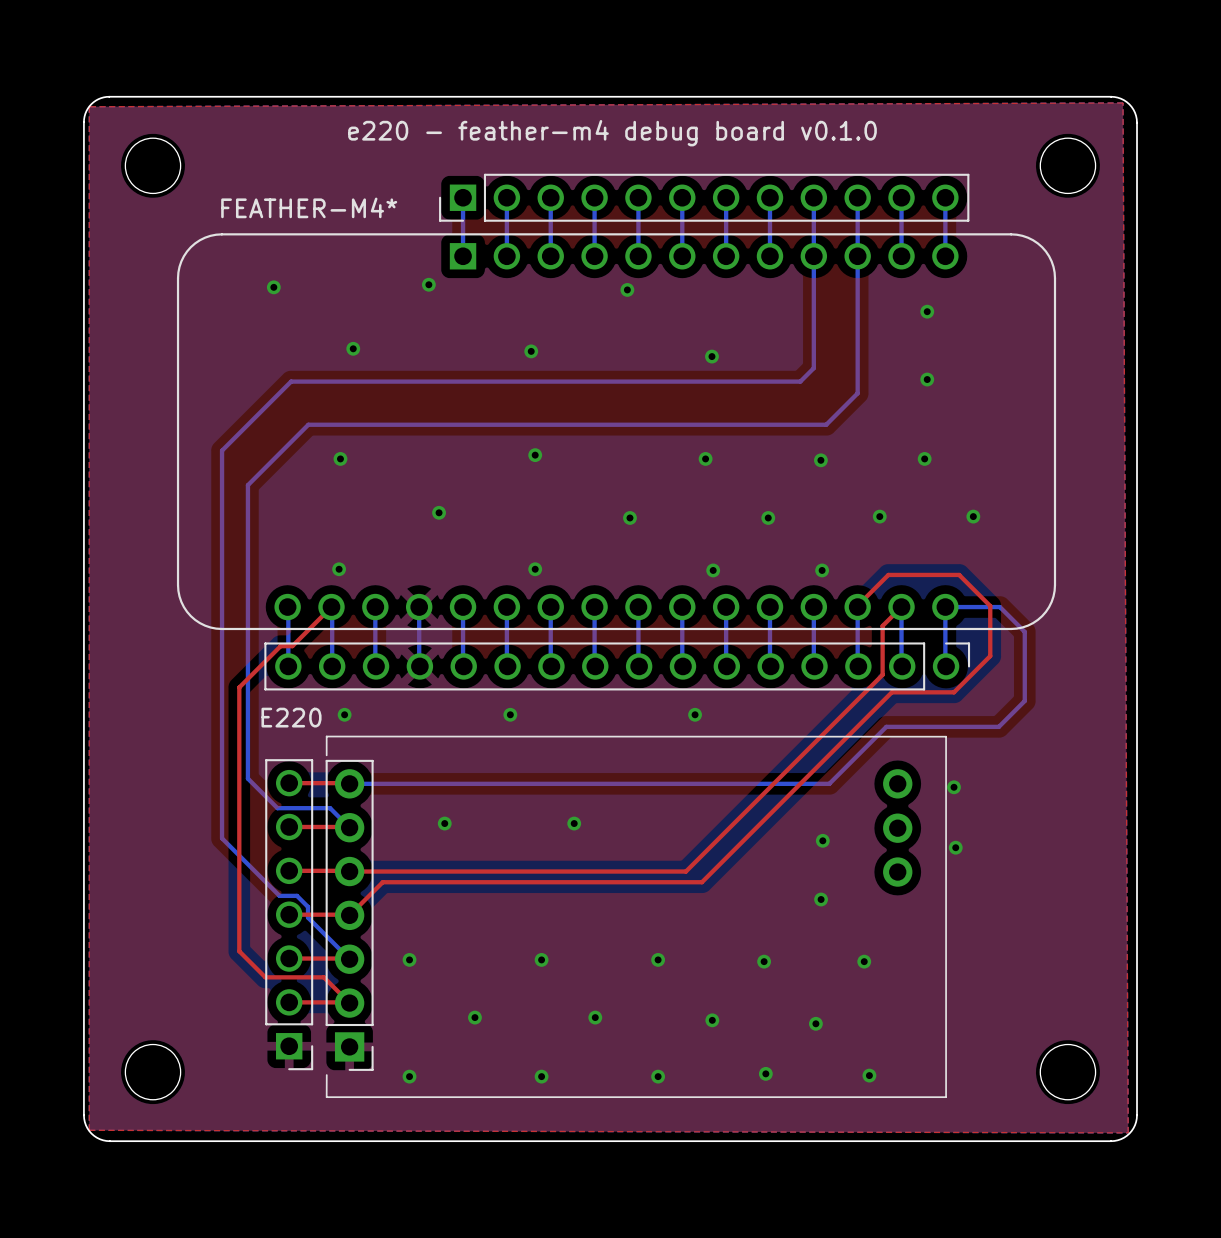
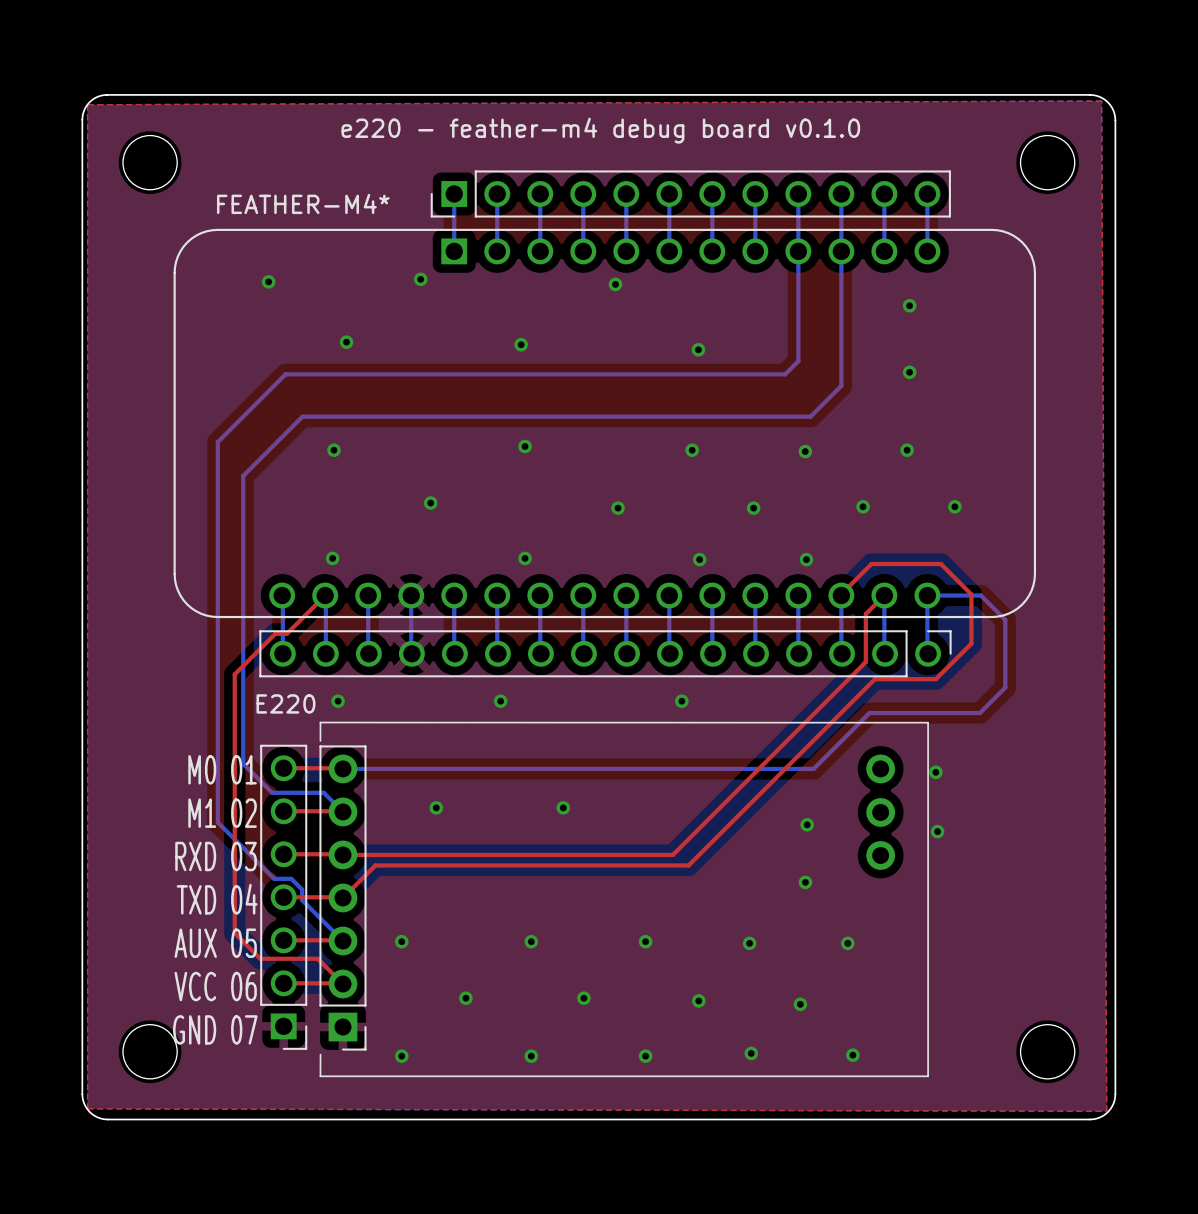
text: none -> M0 01 (222, 769)
text: none -> M1 02 (222, 813)
text: none -> RXD 03 (216, 856)
text: none -> TXD 04 (217, 899)
text: none -> AUX 05 (215, 943)
text: none -> VCC 06 (215, 986)
text: none -> GND 07 (215, 1029)

